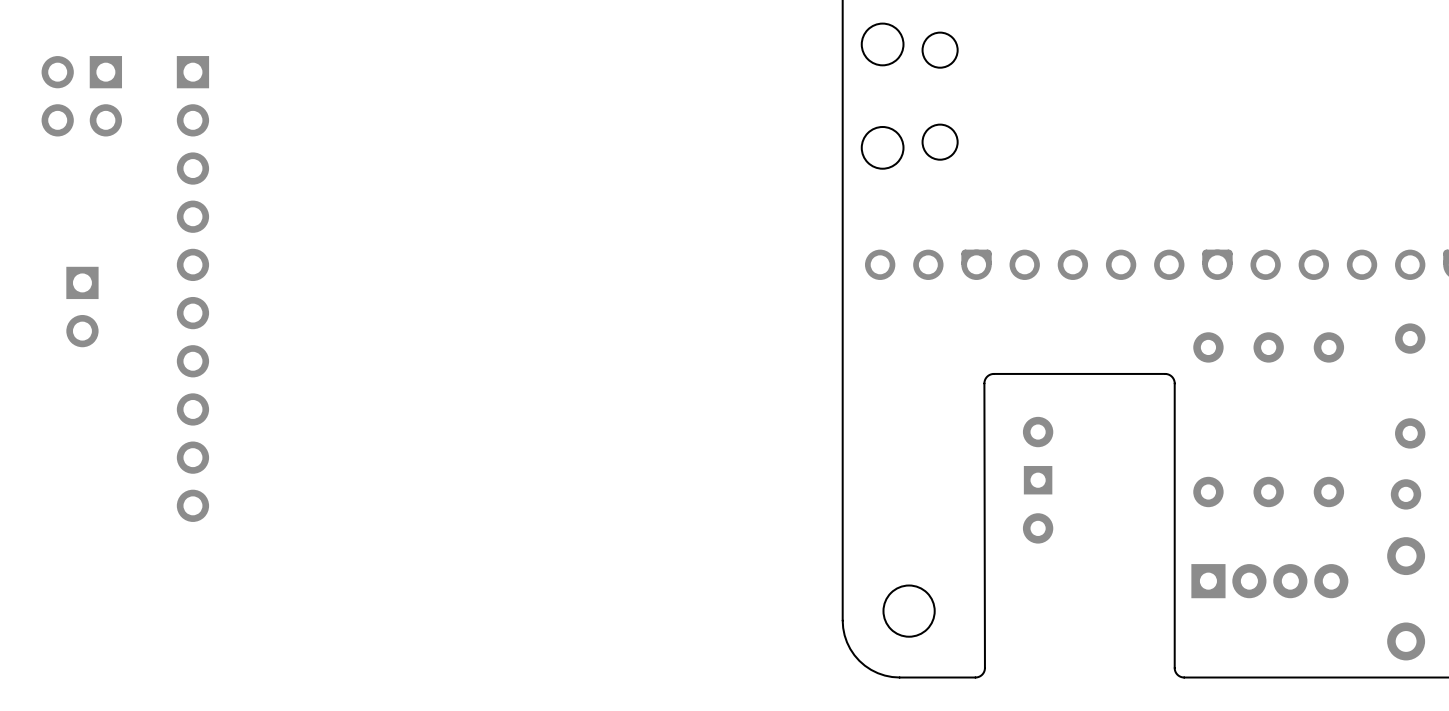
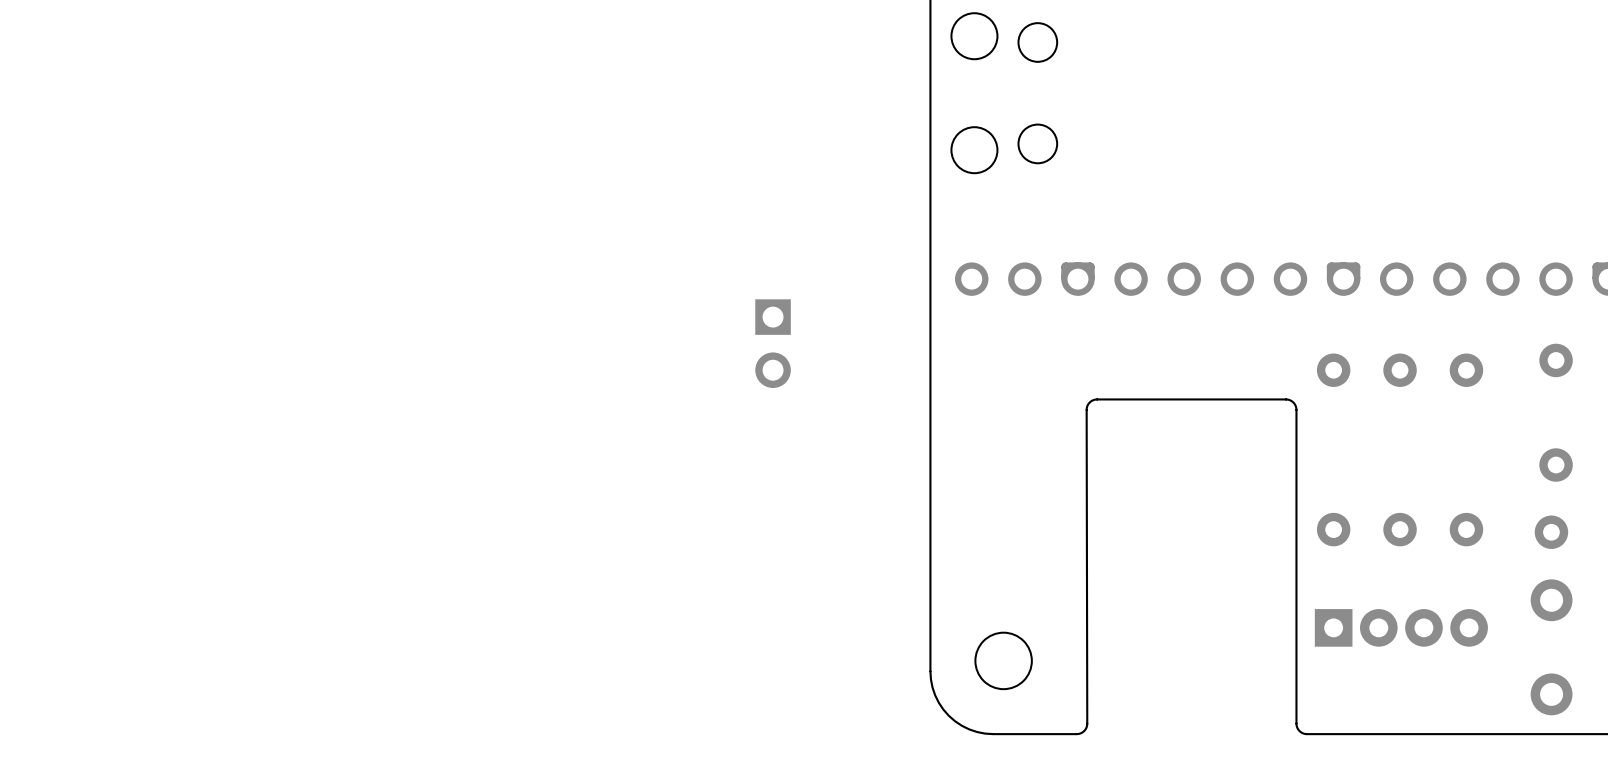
part: (81, 96) -> none
part: (192, 288) -> none
part: (82, 307) -> none
part: none -> (773, 343)
part: (1038, 480) -> none

